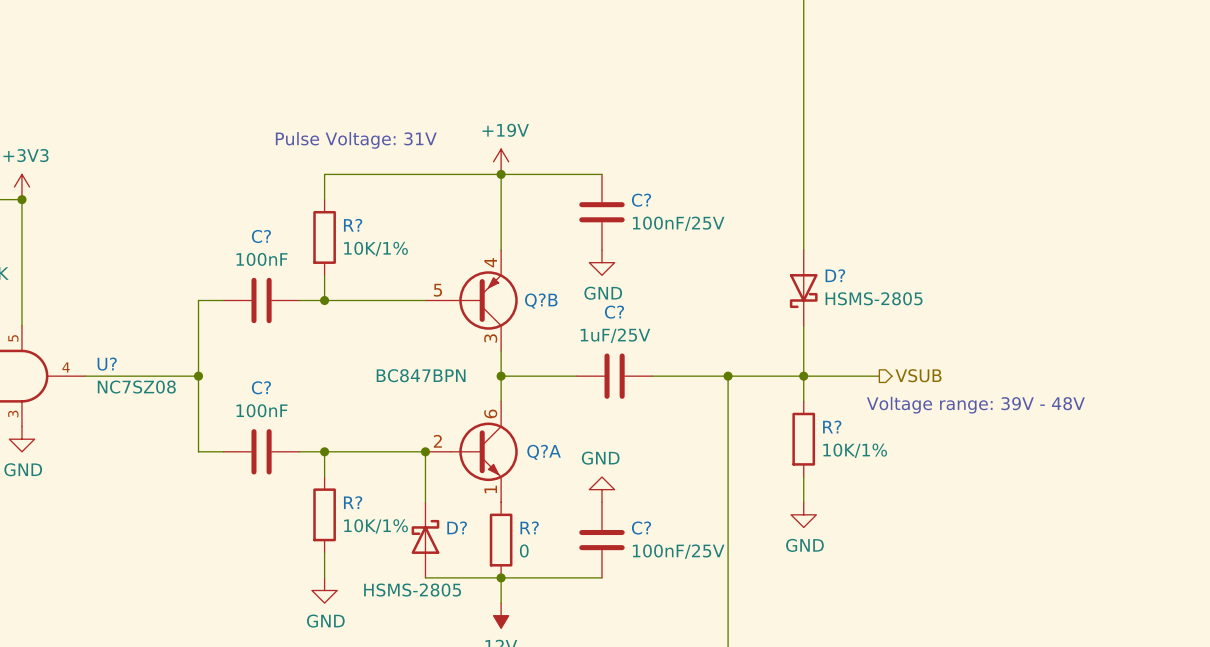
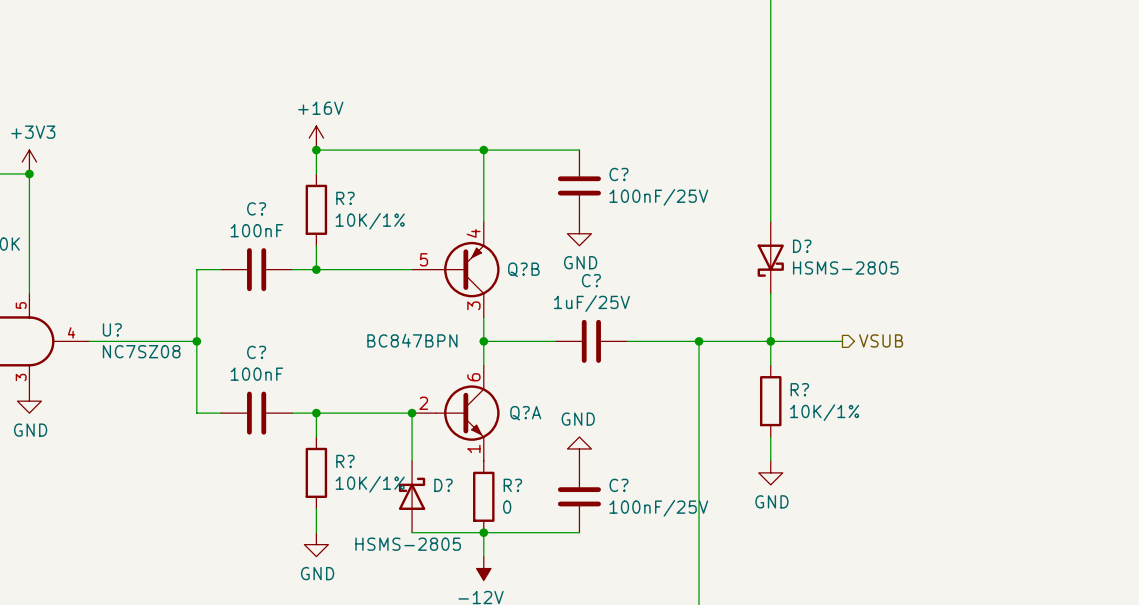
text: Pulse Voltage: 31V (356, 140) -> none
power symbol: none -> +16V (316, 138)
power symbol: +19V (501, 161) -> none
junction: none -> (316, 150)
text: Voltage range: 39V - 48V (975, 405) -> none

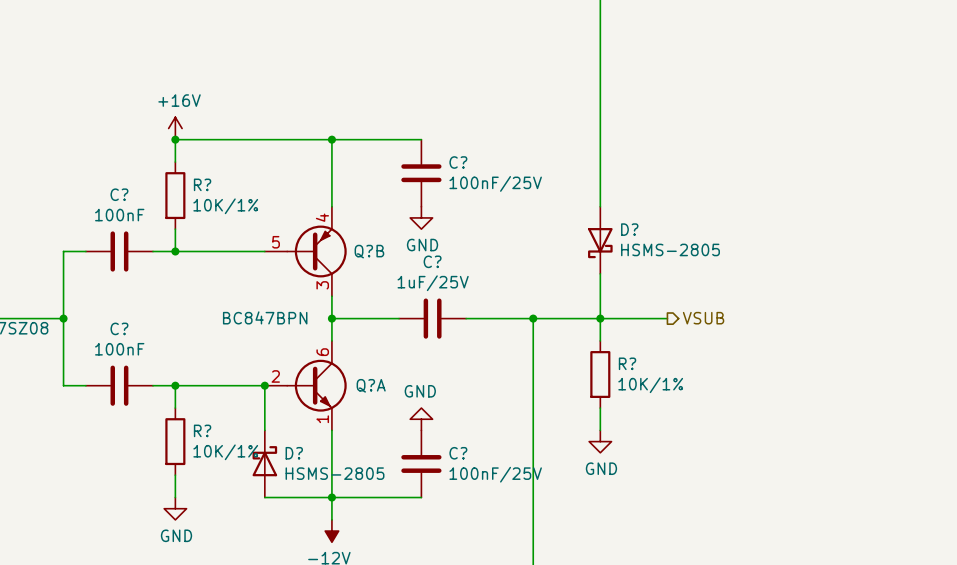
wire: none -> (331, 430) (331, 497)
R?: 0 (483, 496) -> none
D? value position: HSMS-2805 (408, 544) -> HSMS-2805 (335, 473)

